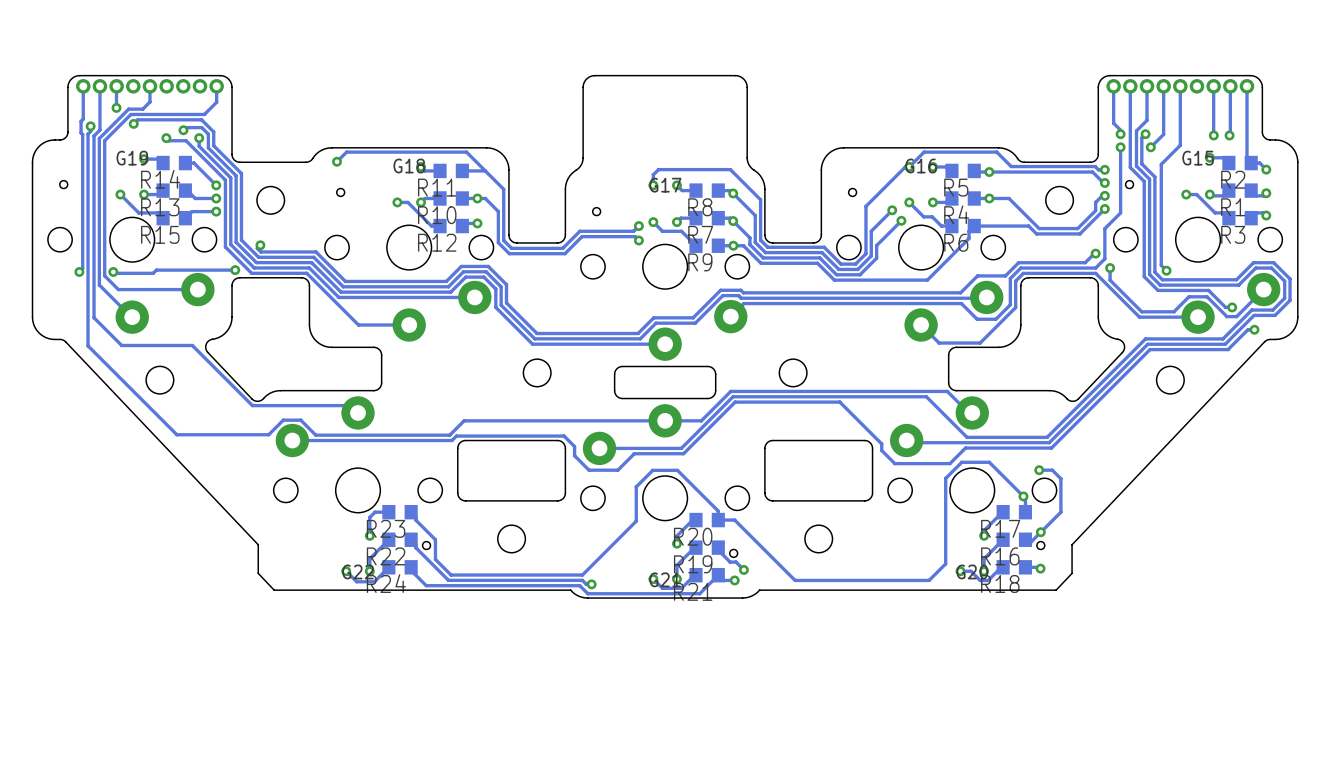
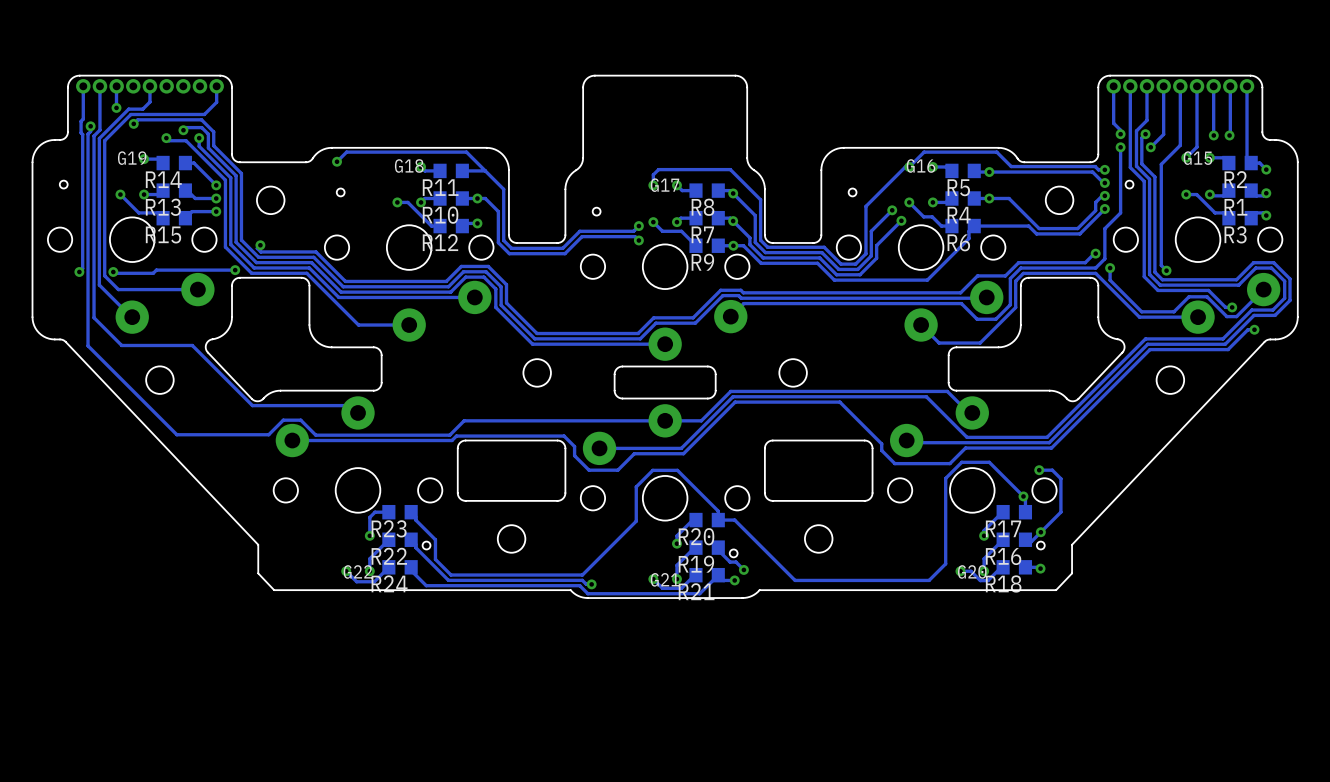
track: none -> (1197, 86) (1197, 147) (1186, 157)
via: none -> (1186, 157)

